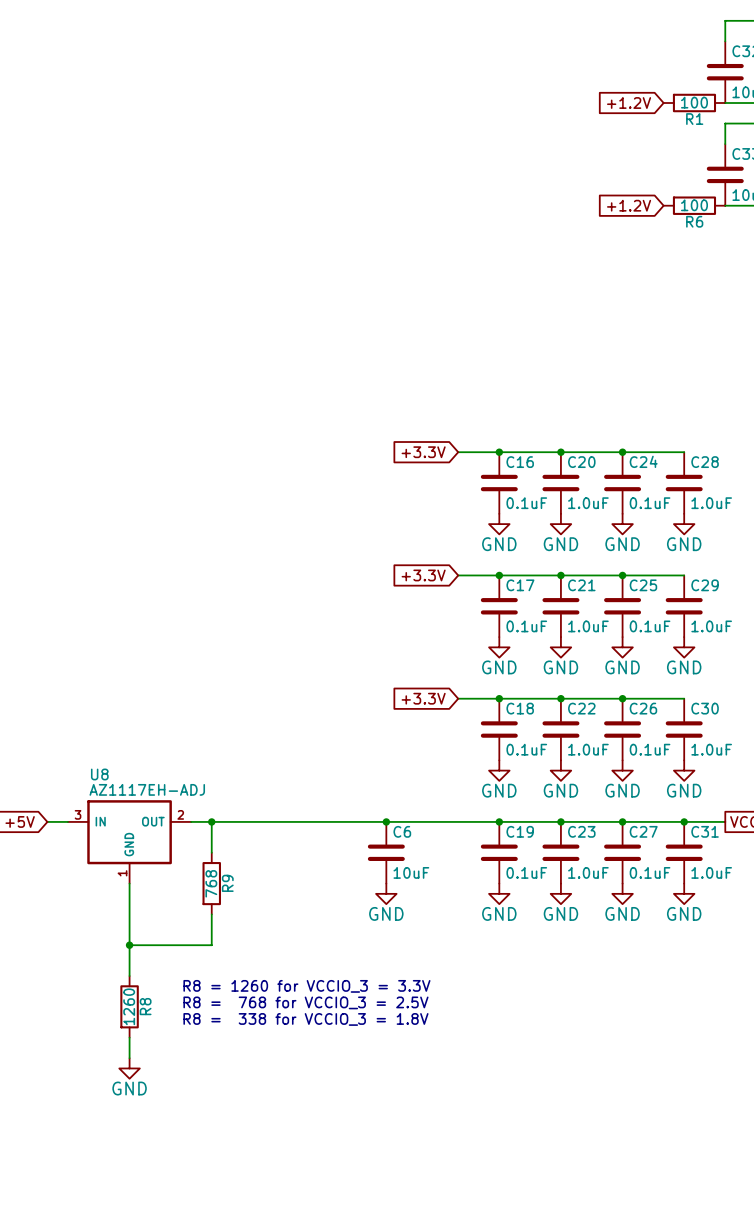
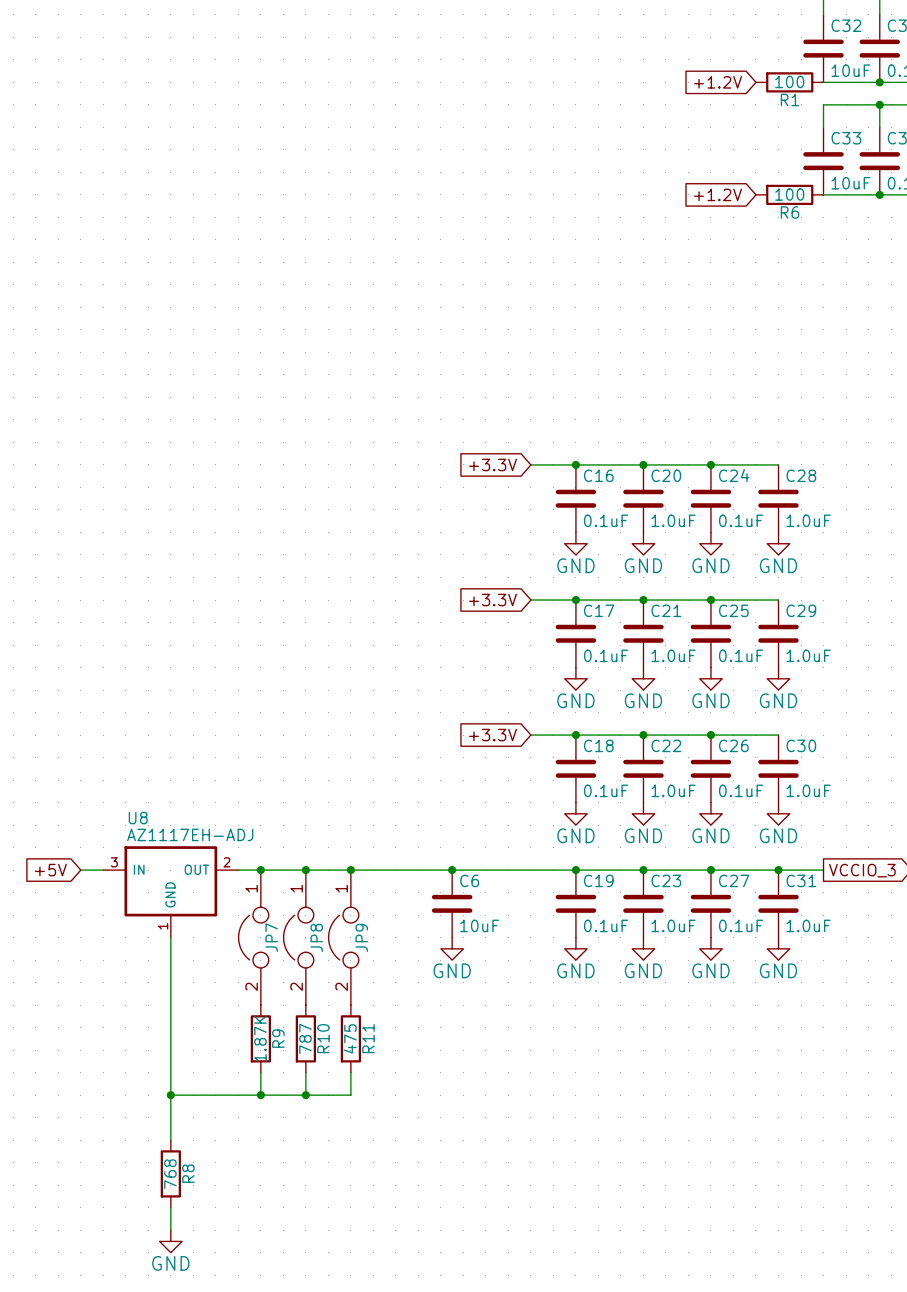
junction: none -> (305, 870)
junction: none -> (350, 870)
JP7: none -> (253, 937)
R9 position: (211, 883) -> (260, 1038)
R9 value: 768 (211, 883) -> 1.87K (260, 1038)
JP8: none -> (298, 937)
JP9: none -> (343, 937)
wire: (211, 914) (211, 945) (129, 945) -> none
junction: (129, 945) -> none
wire: none -> (170, 1038) (170, 1106)
R10: none -> 787 (305, 1038)
R11: none -> 475 (350, 1038)
text: R8 = 1260 for VCCIO_3 = 3.3V (306, 986) -> none
text: R8 = 768 for VCCIO_3 = 2.5V (305, 1002) -> none
R8 position: (129, 1006) -> (170, 1173)
R8 value: 1260 (129, 1006) -> 768 (170, 1174)
wire: none -> (260, 1072) (260, 1095)
wire: none -> (305, 1072) (305, 1095)
wire: none -> (350, 1072) (350, 1095) (170, 1095)
text: R8 = 338 for VCCIO_3 = 1.8V (305, 1019) -> none
junction: none -> (170, 1095)
junction: none -> (260, 1095)
junction: none -> (305, 1095)
power symbol position: GND (129, 1068) -> GND (170, 1241)
wire: none -> (170, 1207) (170, 1230)

